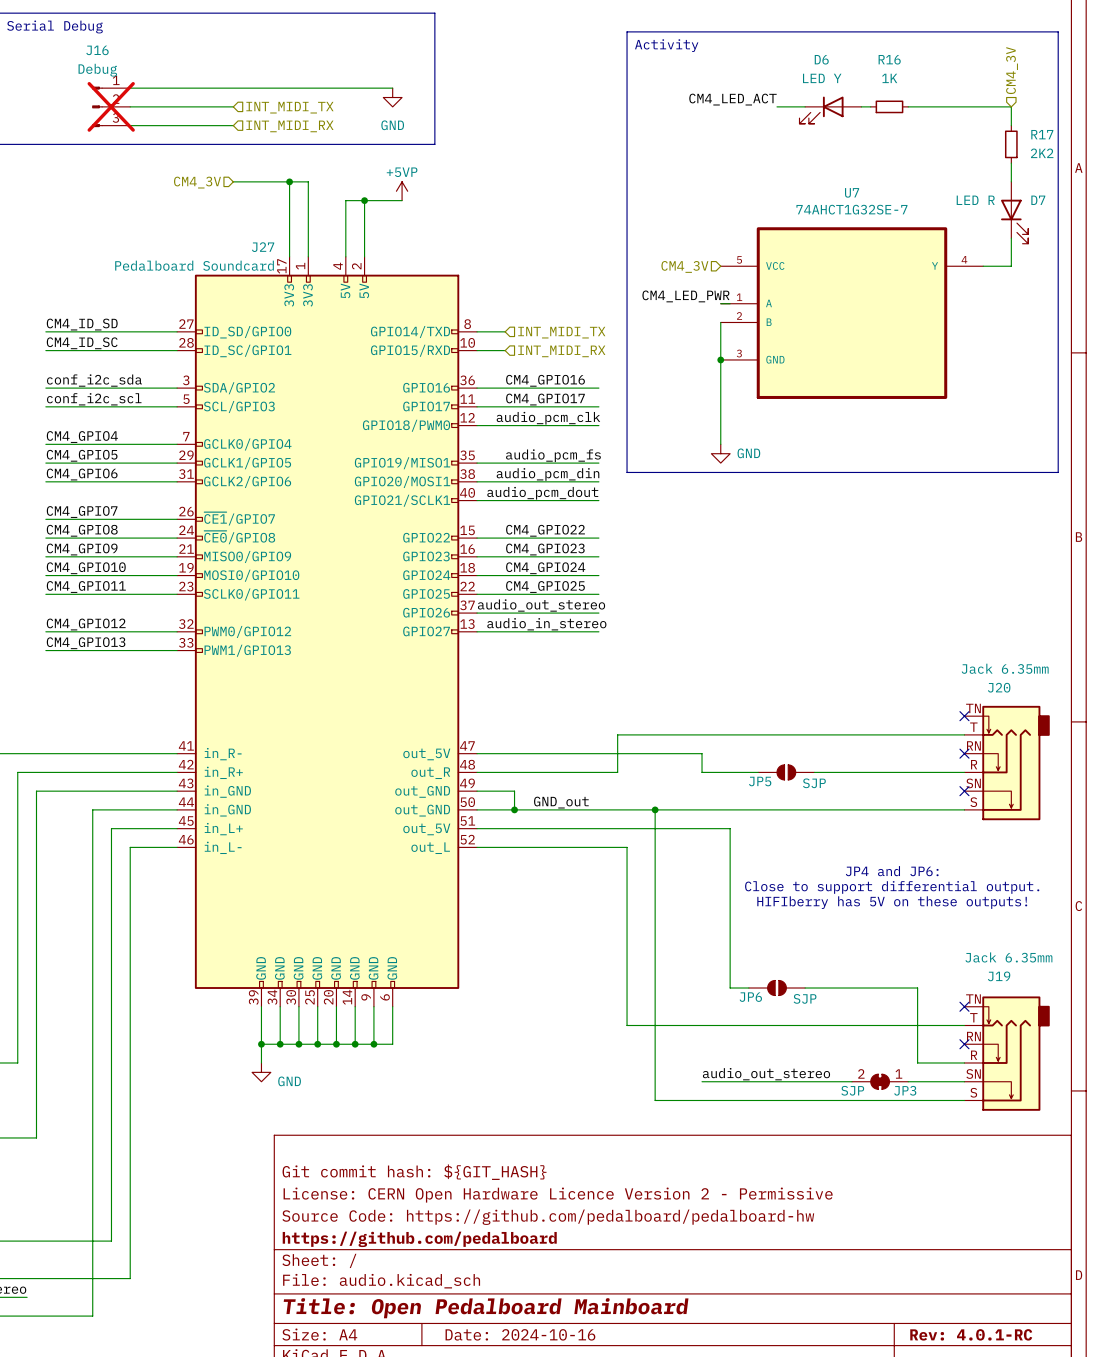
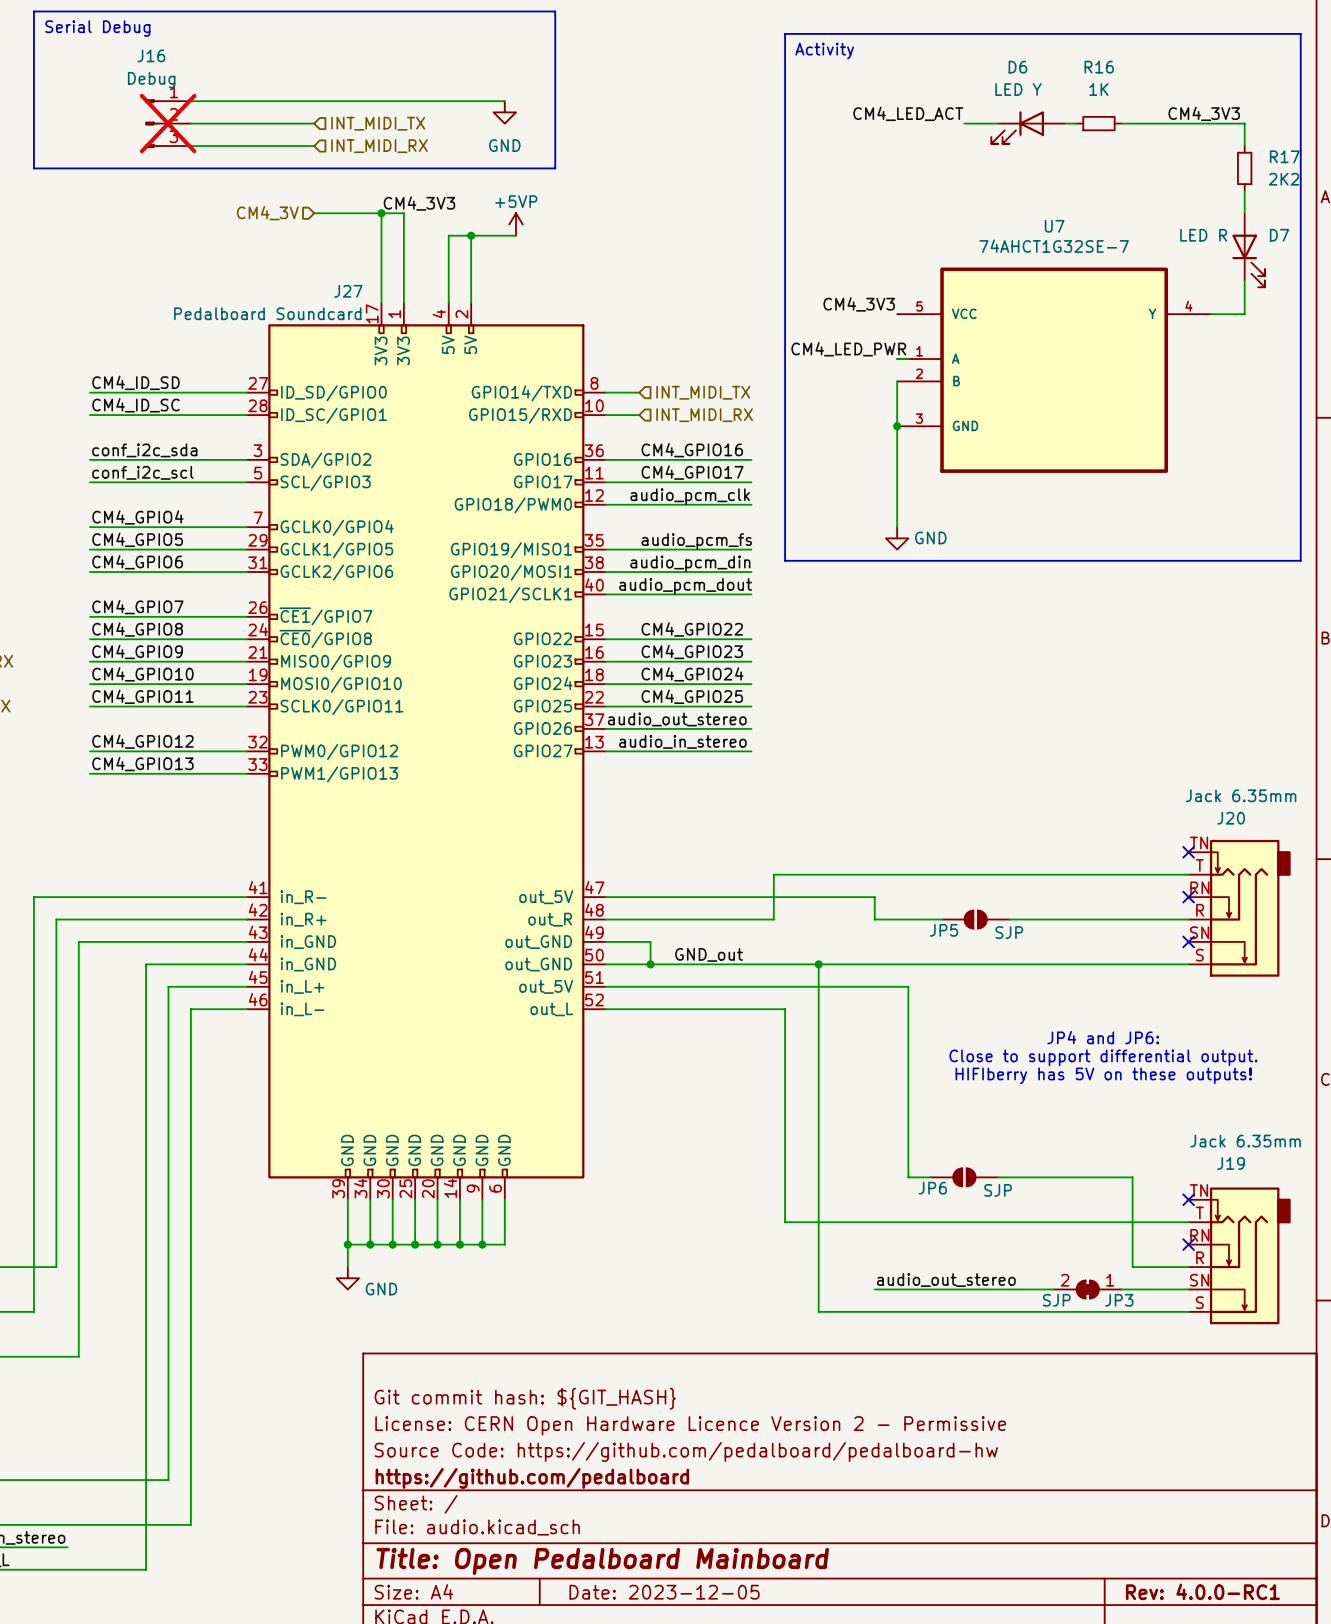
hierarchical label: CM4_3V (1012, 70) -> none
label: none -> CM4_3V3 (1204, 113)
label: none -> CM4_3V3 (419, 203)
label: none -> CM4_3V3 (859, 304)
hierarchical label: CM4_3V (684, 266) -> none
title block: Date: 2024-10-16 (520, 1334) -> Date: 2023-12-05 (664, 1592)
title block: Rev: 4.0.1-RC (971, 1334) -> Rev: 4.0.0-RC1 (1202, 1591)

